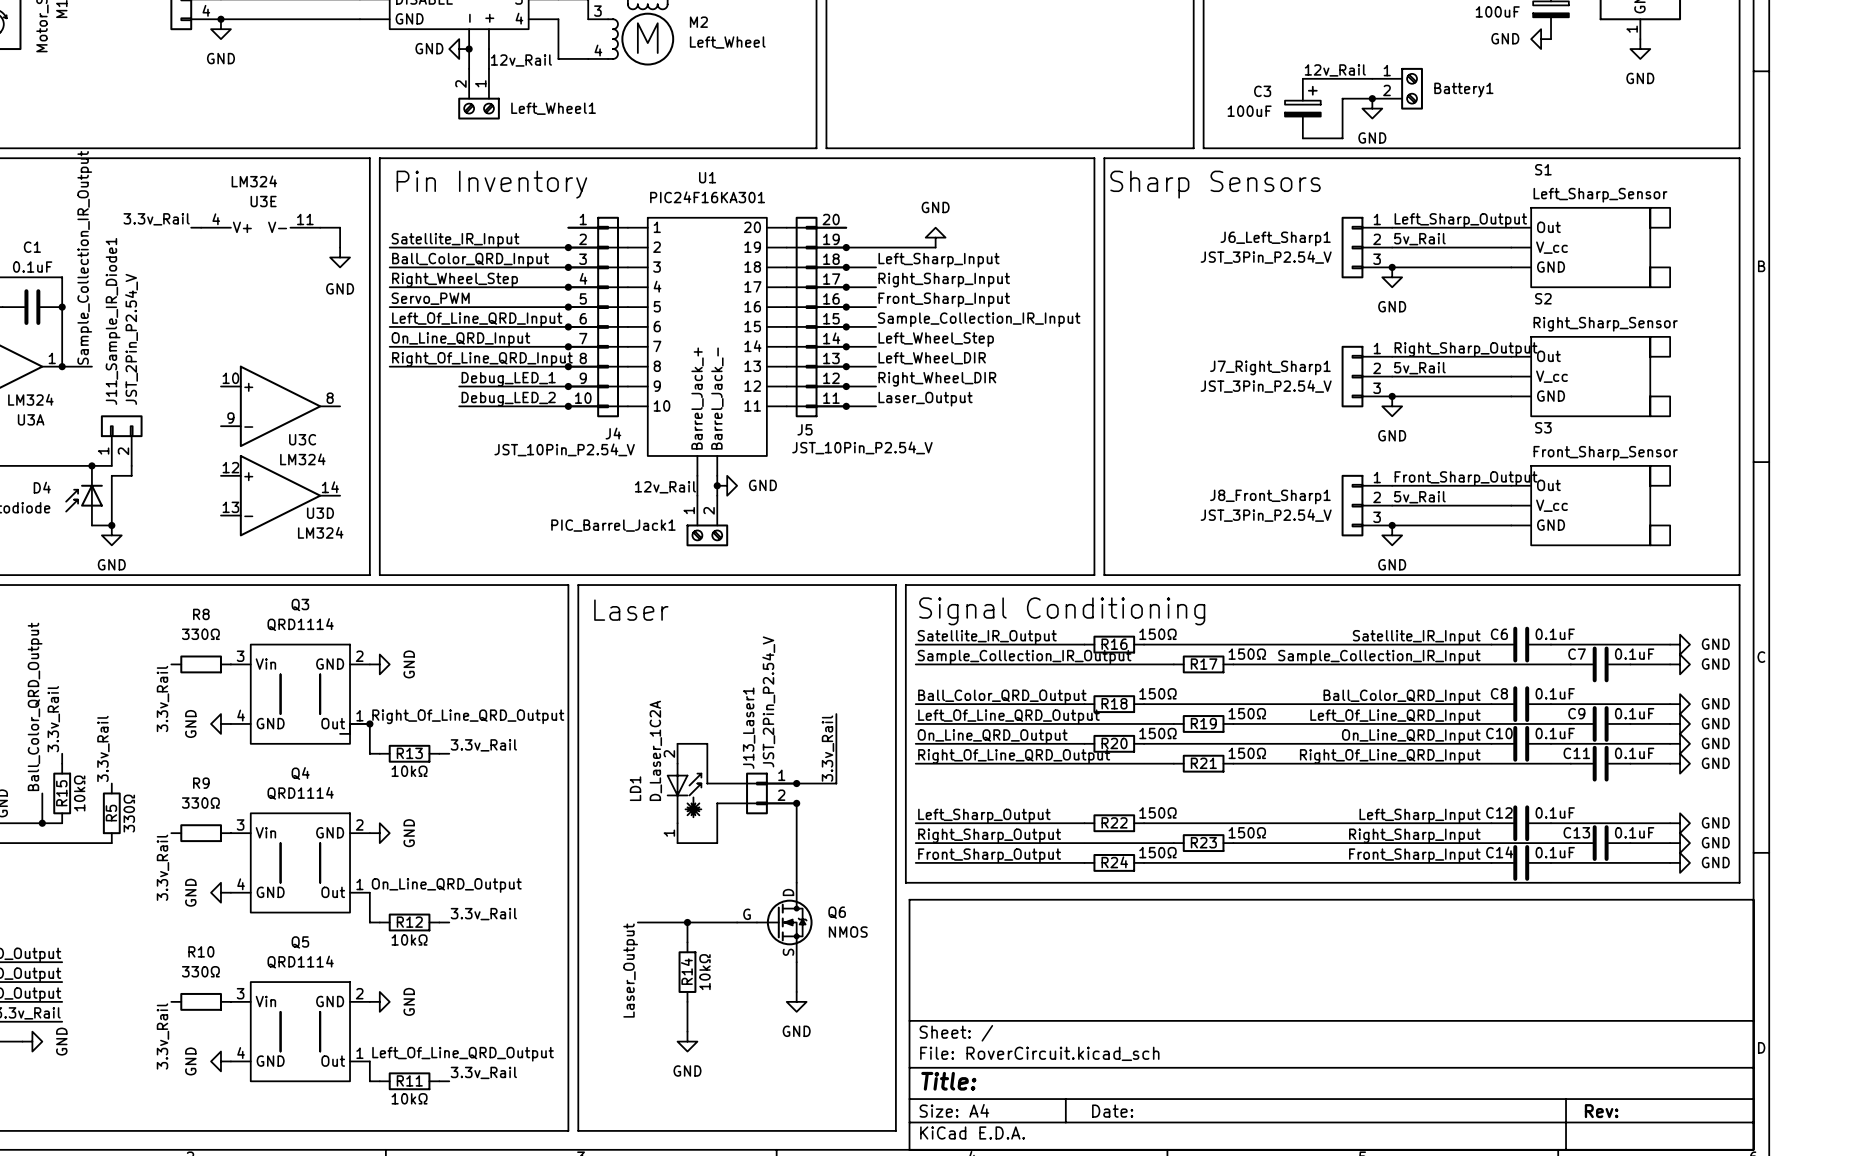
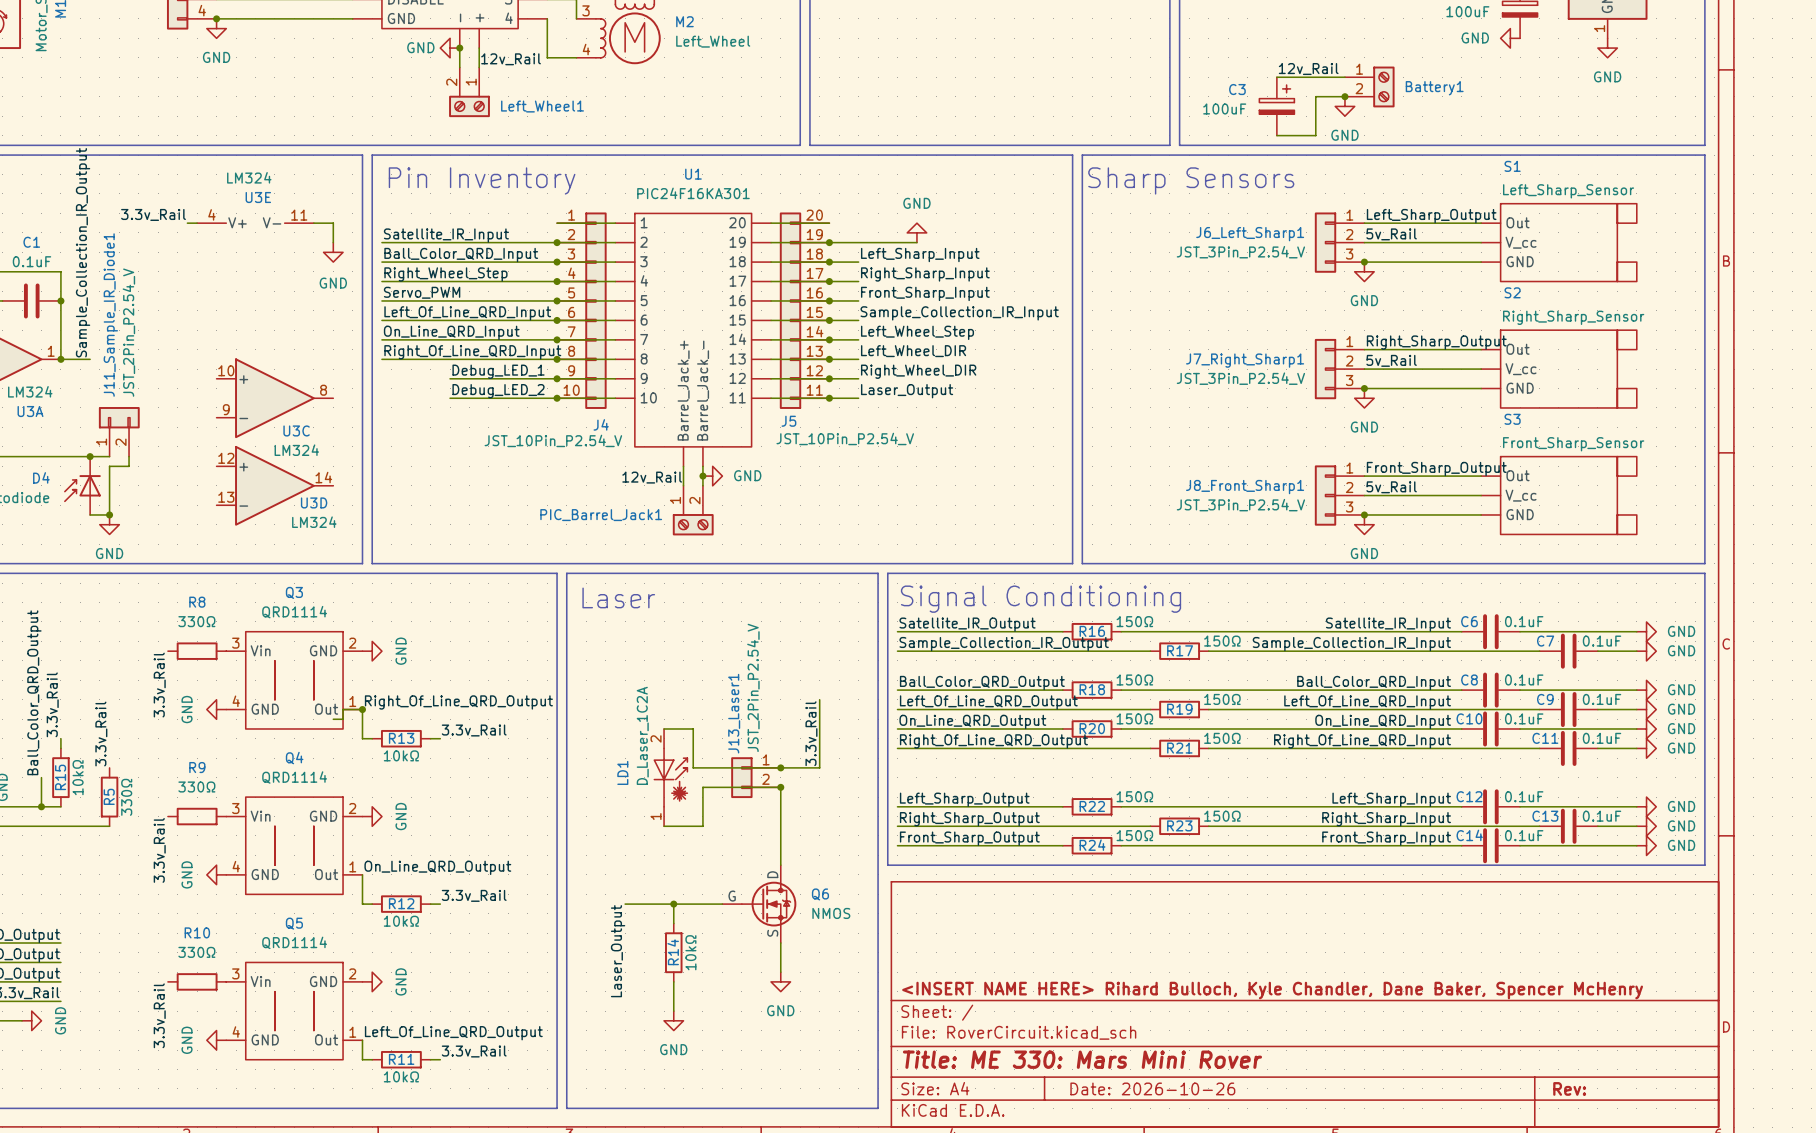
title block: none -> <INSERT NAME HERE> Rihard Bulloch, Kyle Chandler, Dane Baker, Spencer McHenry (1272, 990)
title block: Title: (948, 1081) -> Title: ME 330: Mars Mini Rover (1082, 1059)
title block: Date: (1112, 1111) -> Date: 2026-10-26 (1152, 1088)

